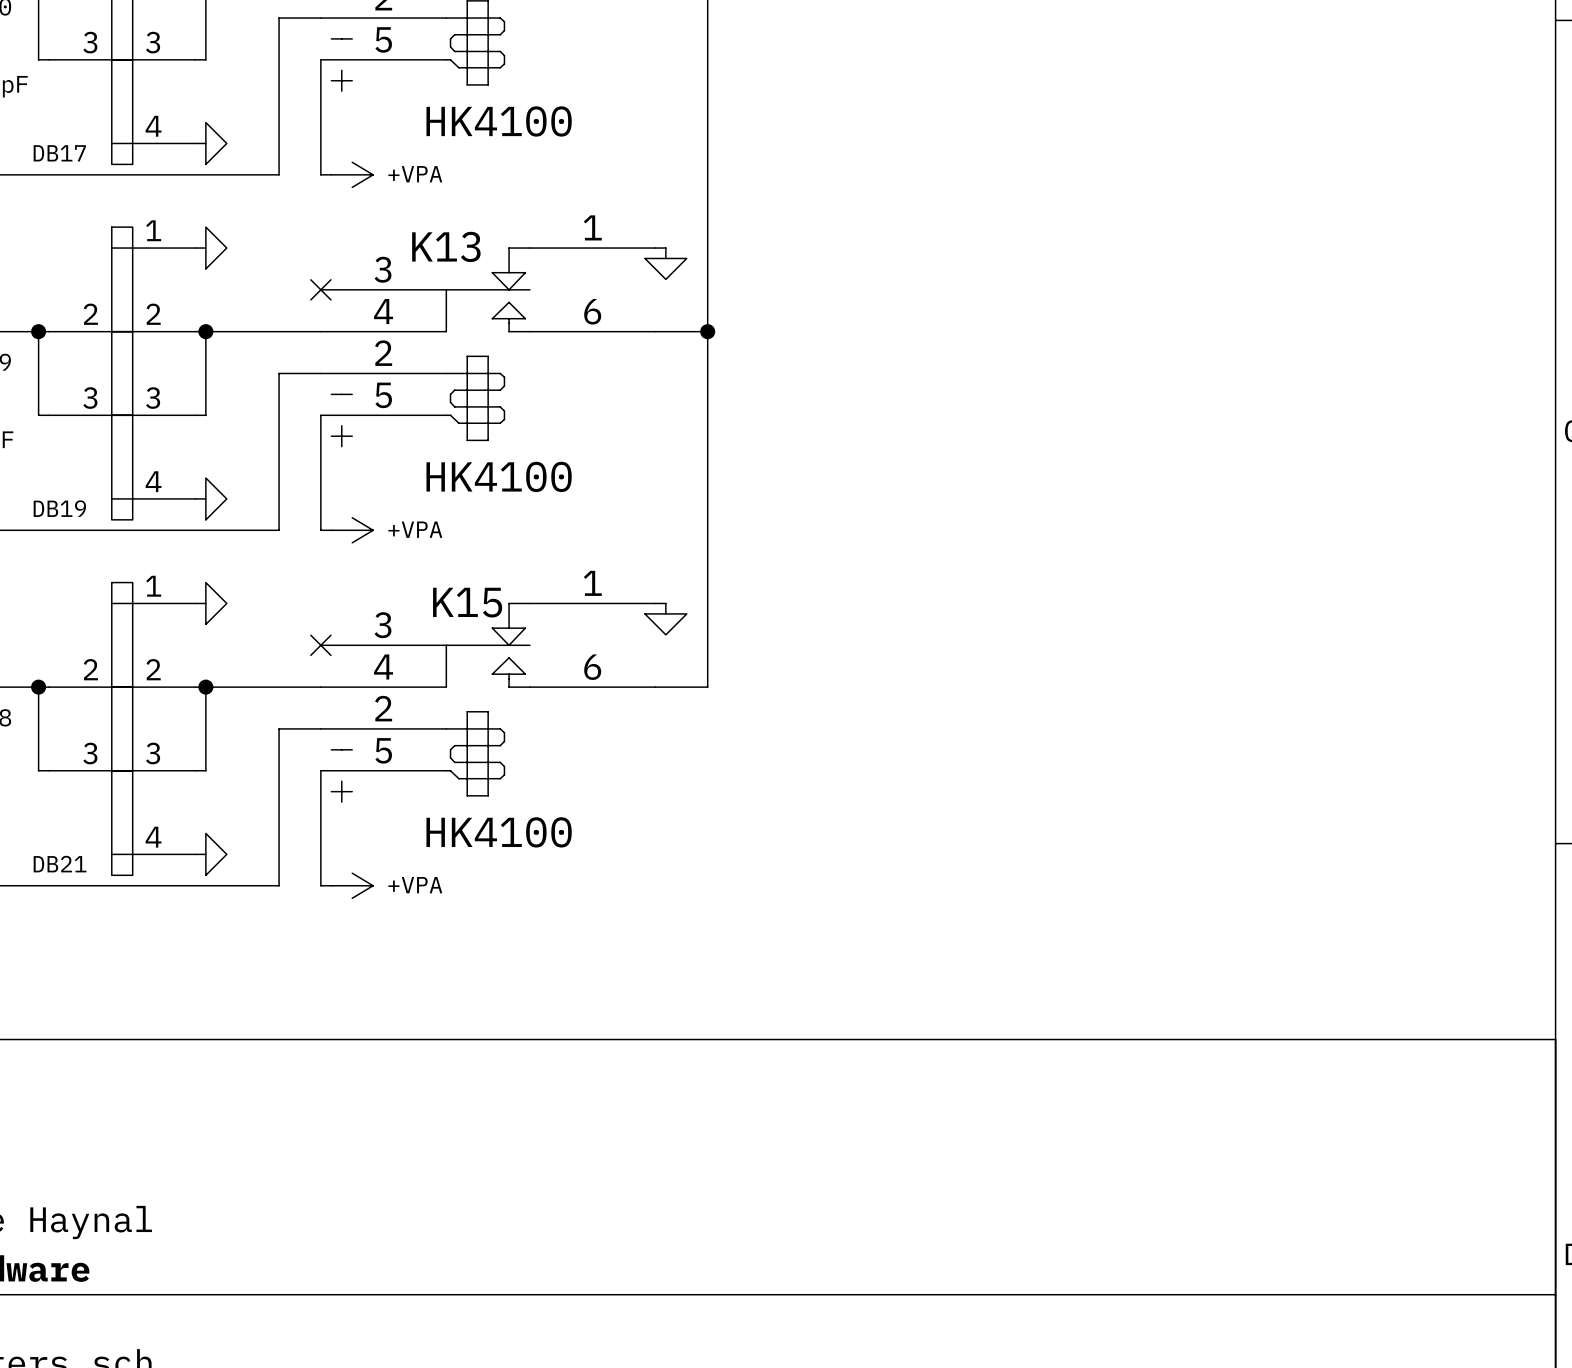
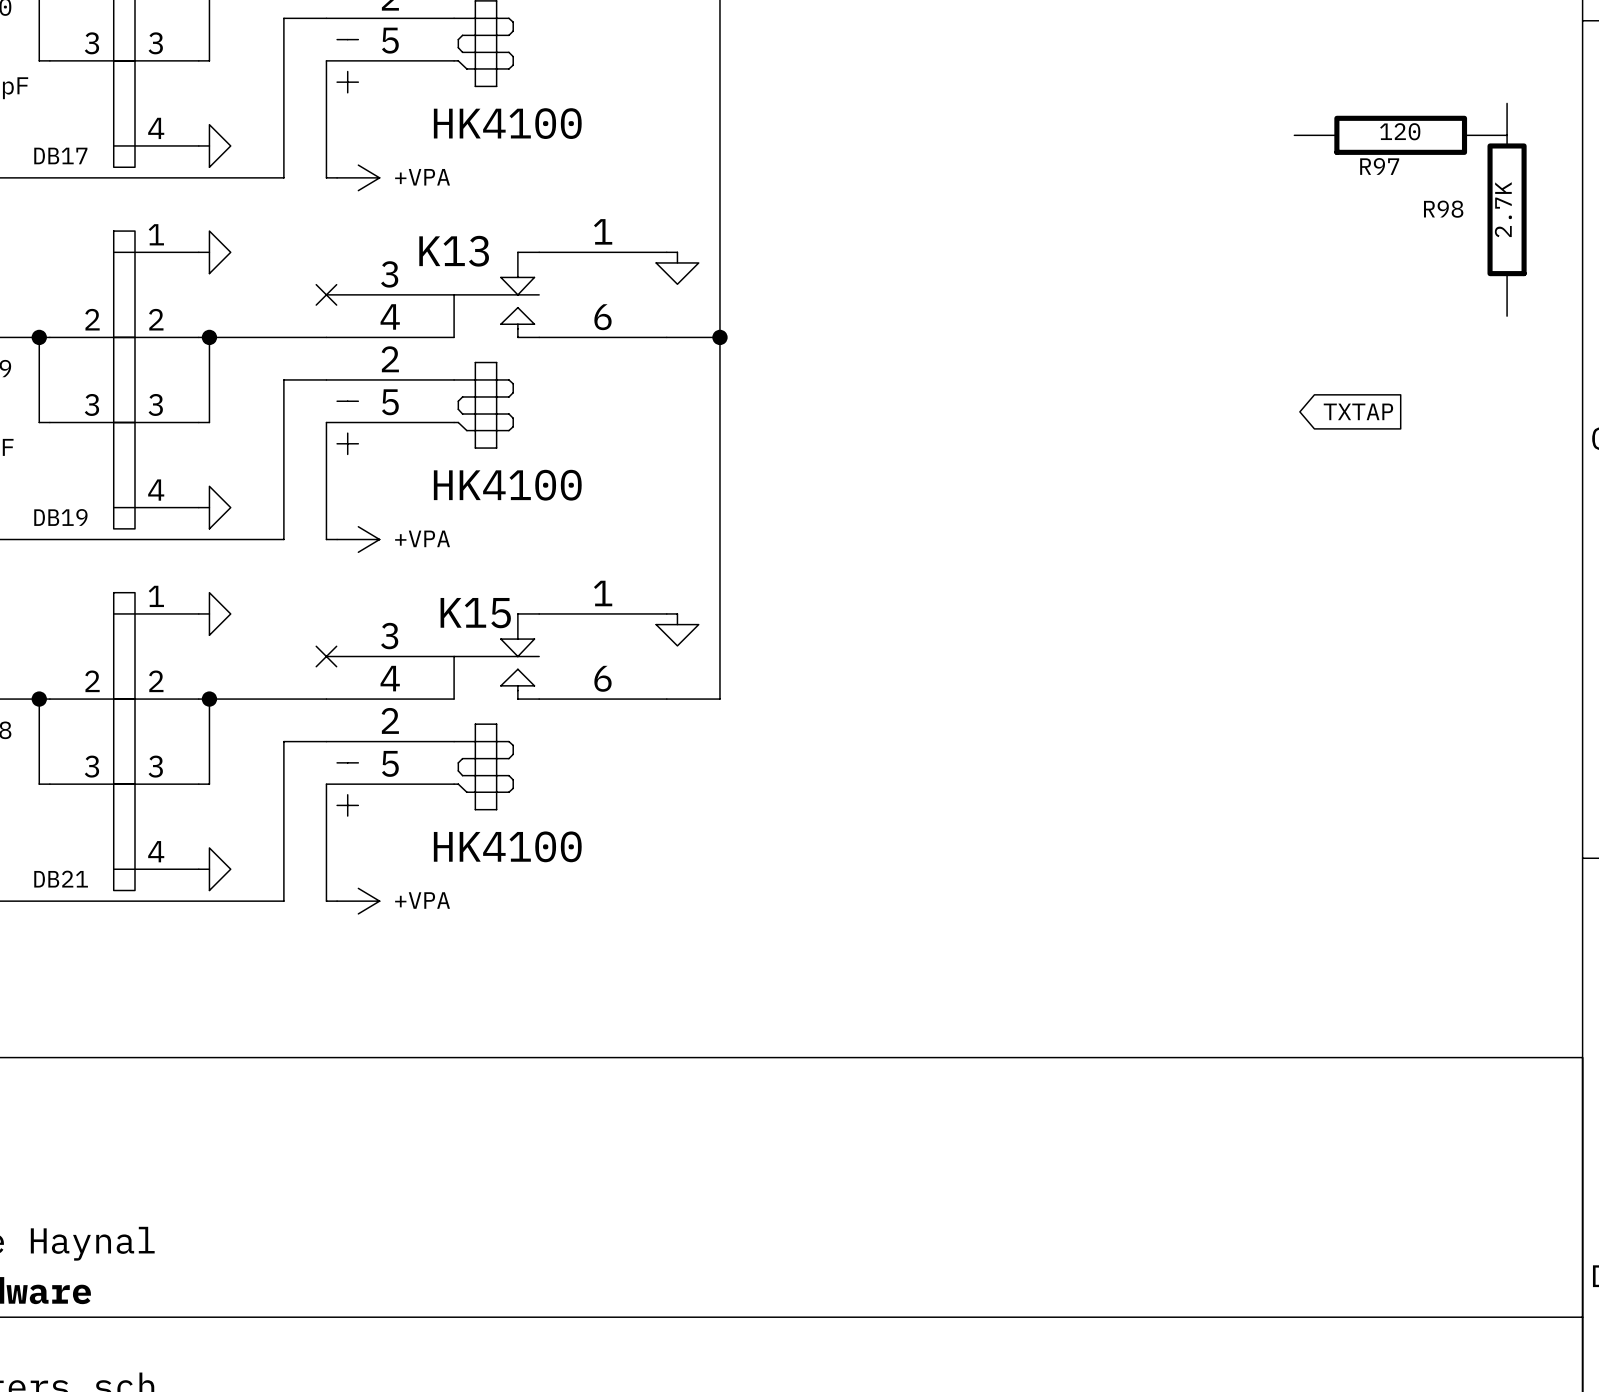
R97: none -> 120 (1400, 135)
R98: none -> 2.7K (1507, 209)
global label: none -> TXTAP (1358, 411)

